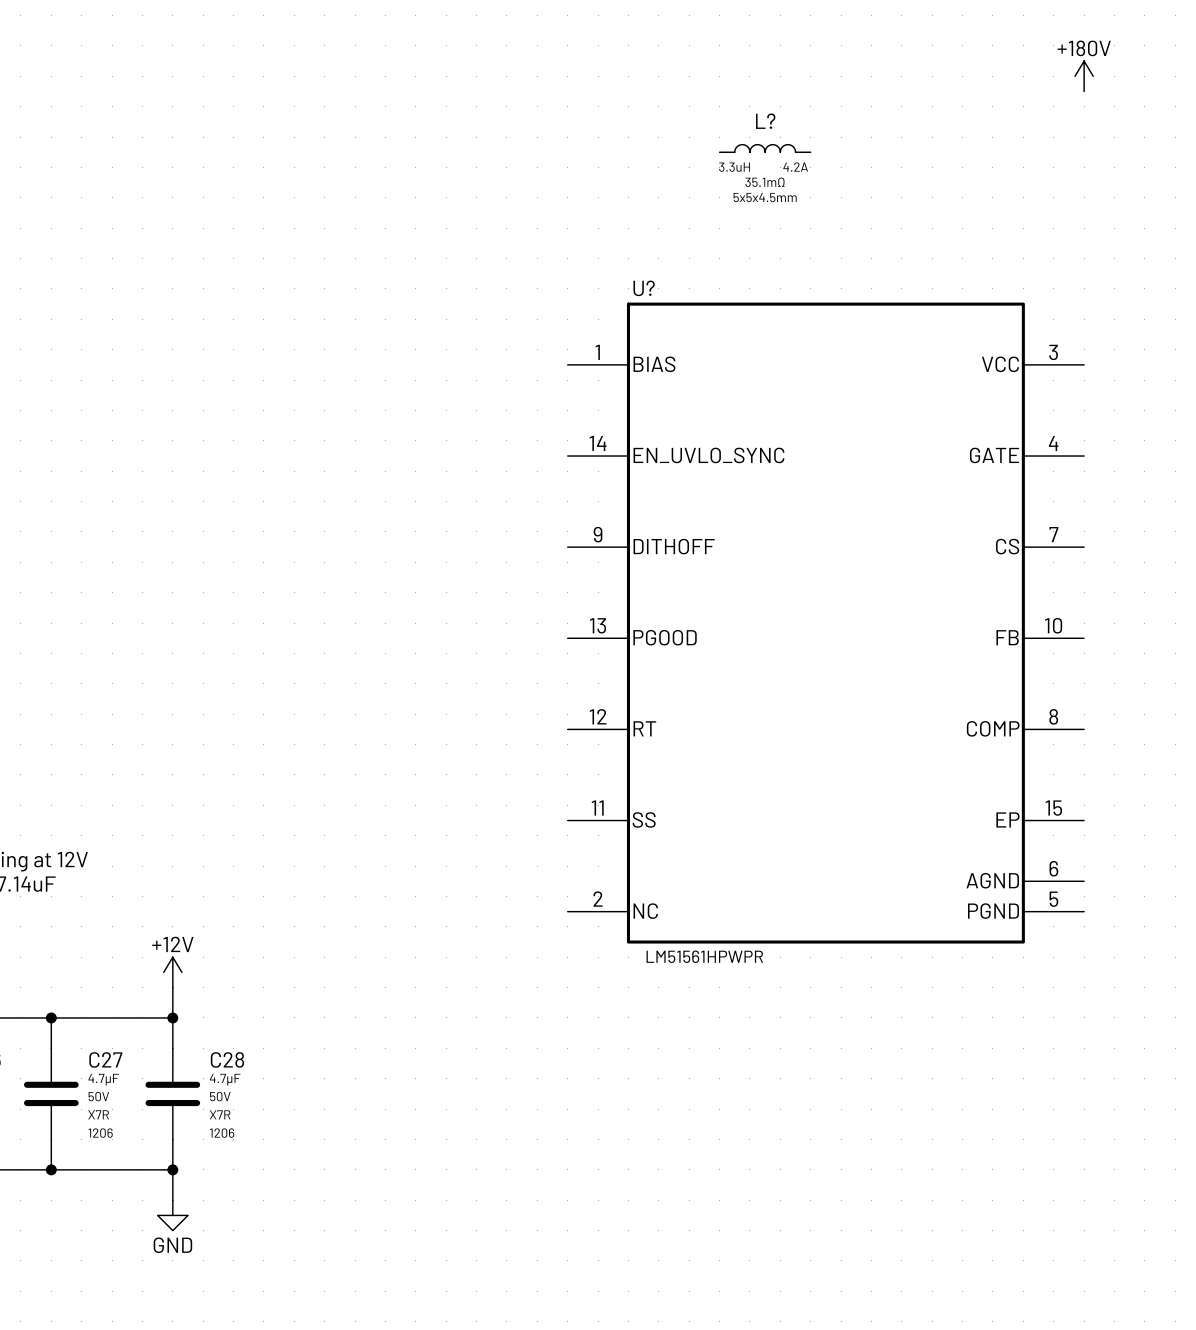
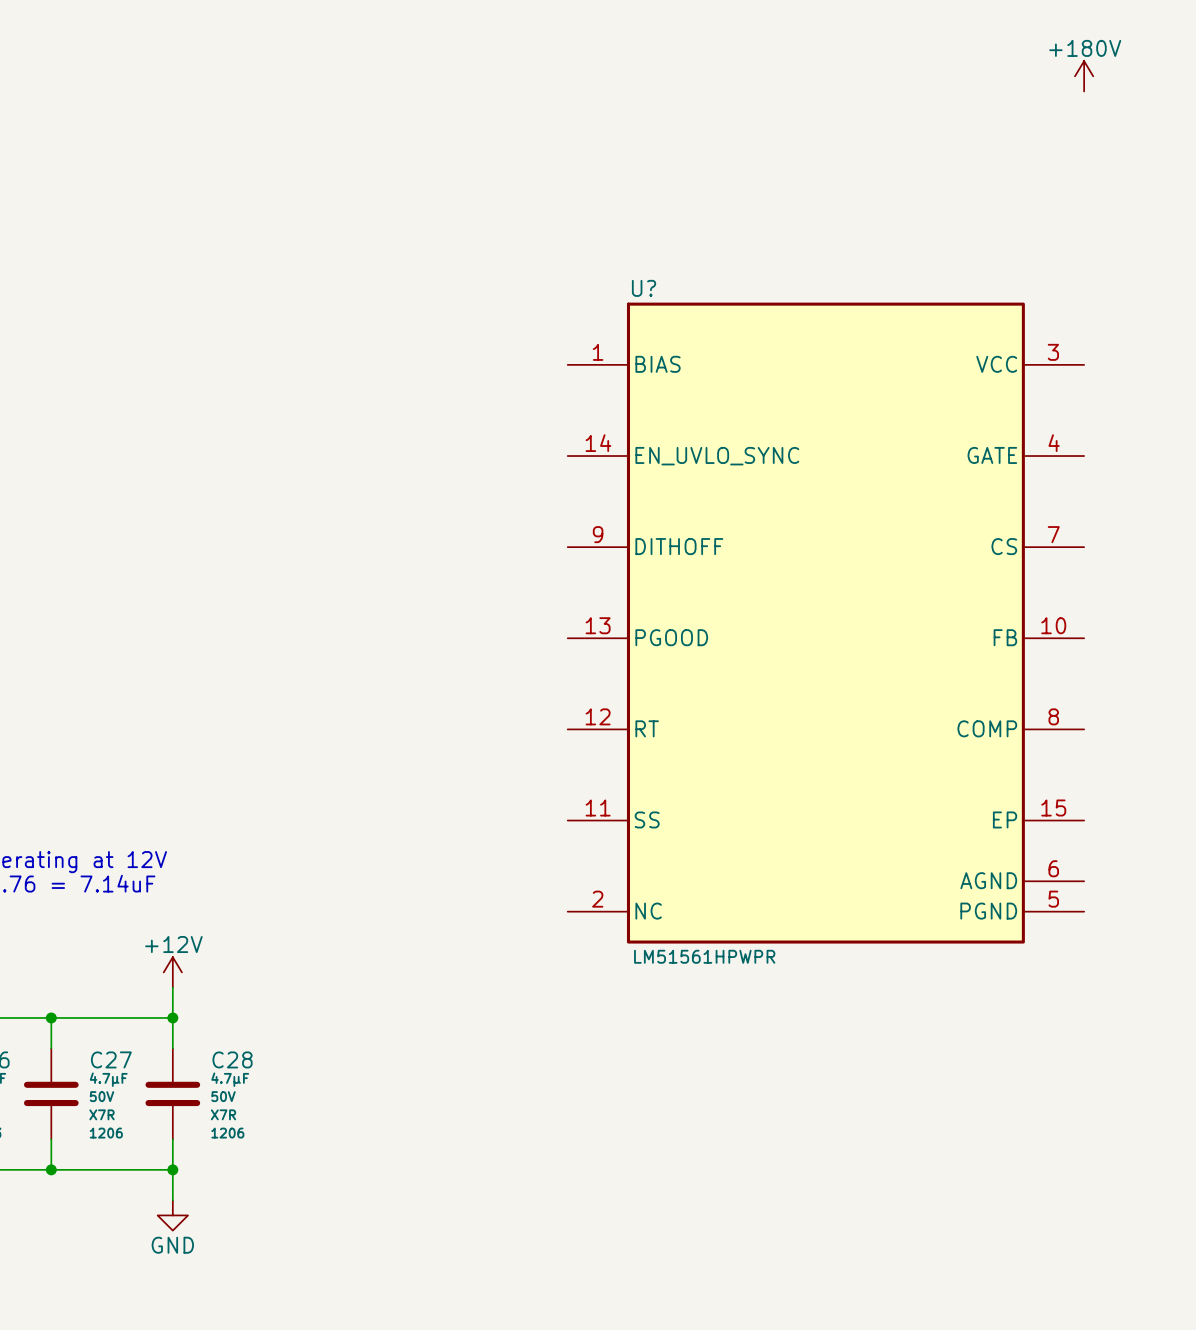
L?: (765, 148) -> none

